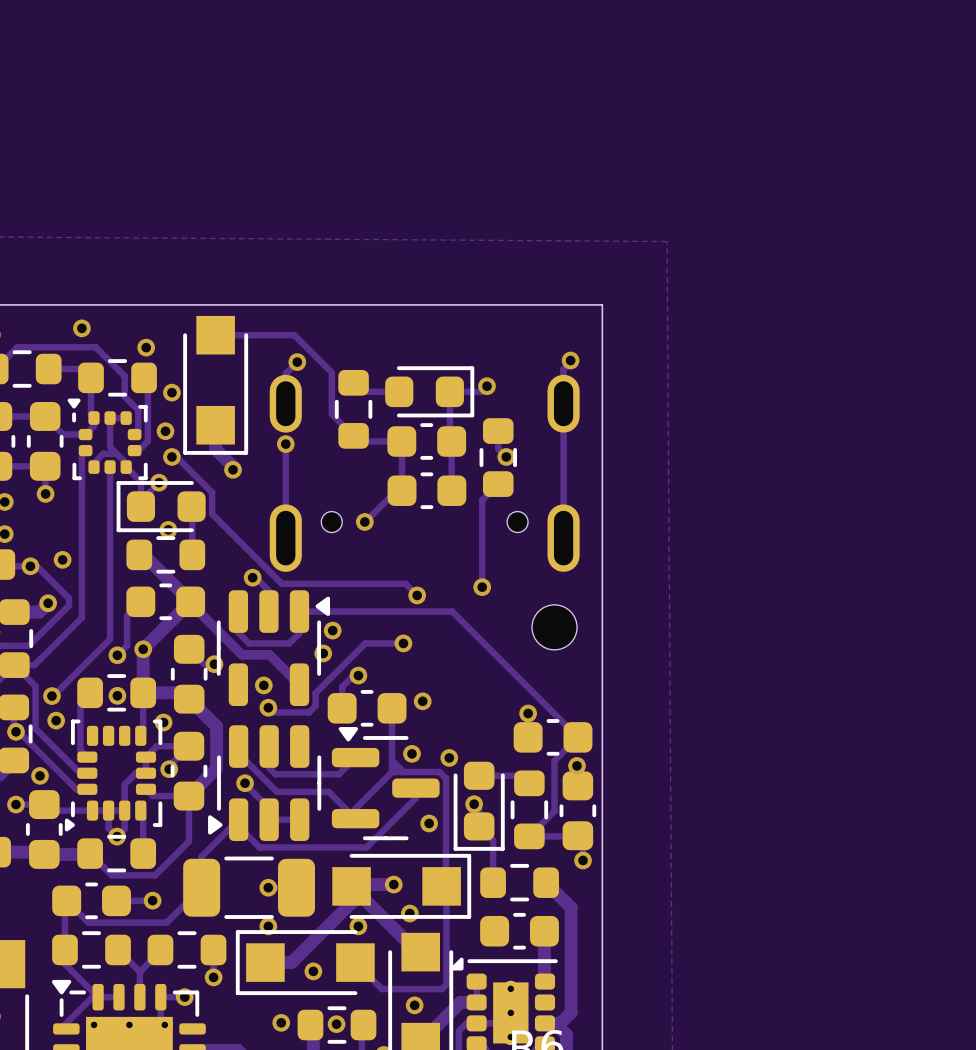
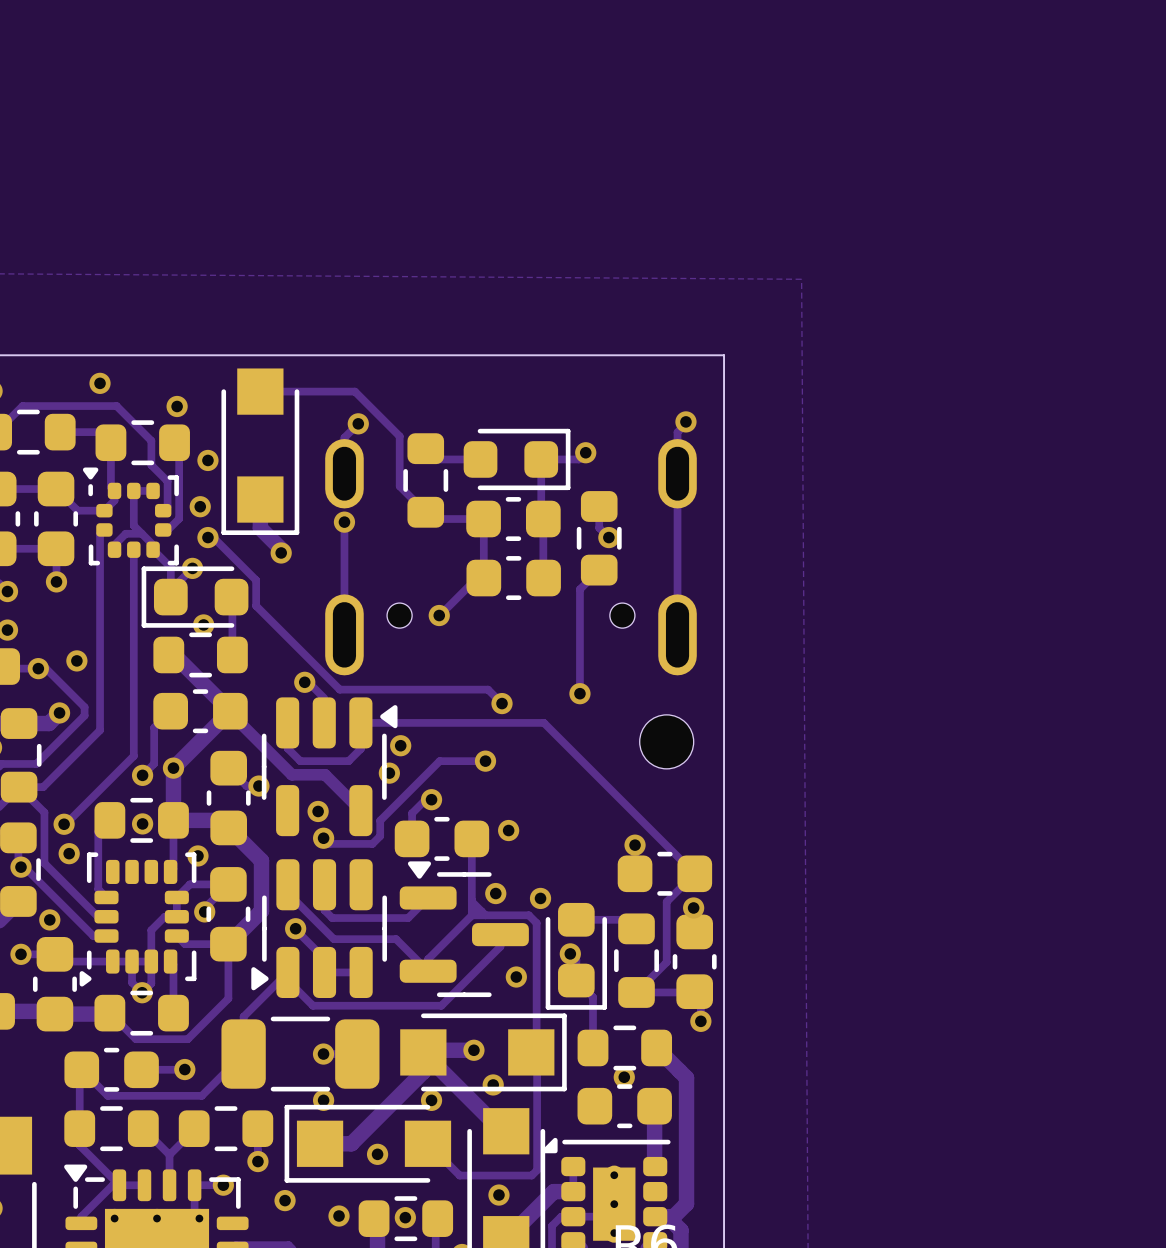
via: none -> (624, 1077)
via: none -> (285, 1200)

